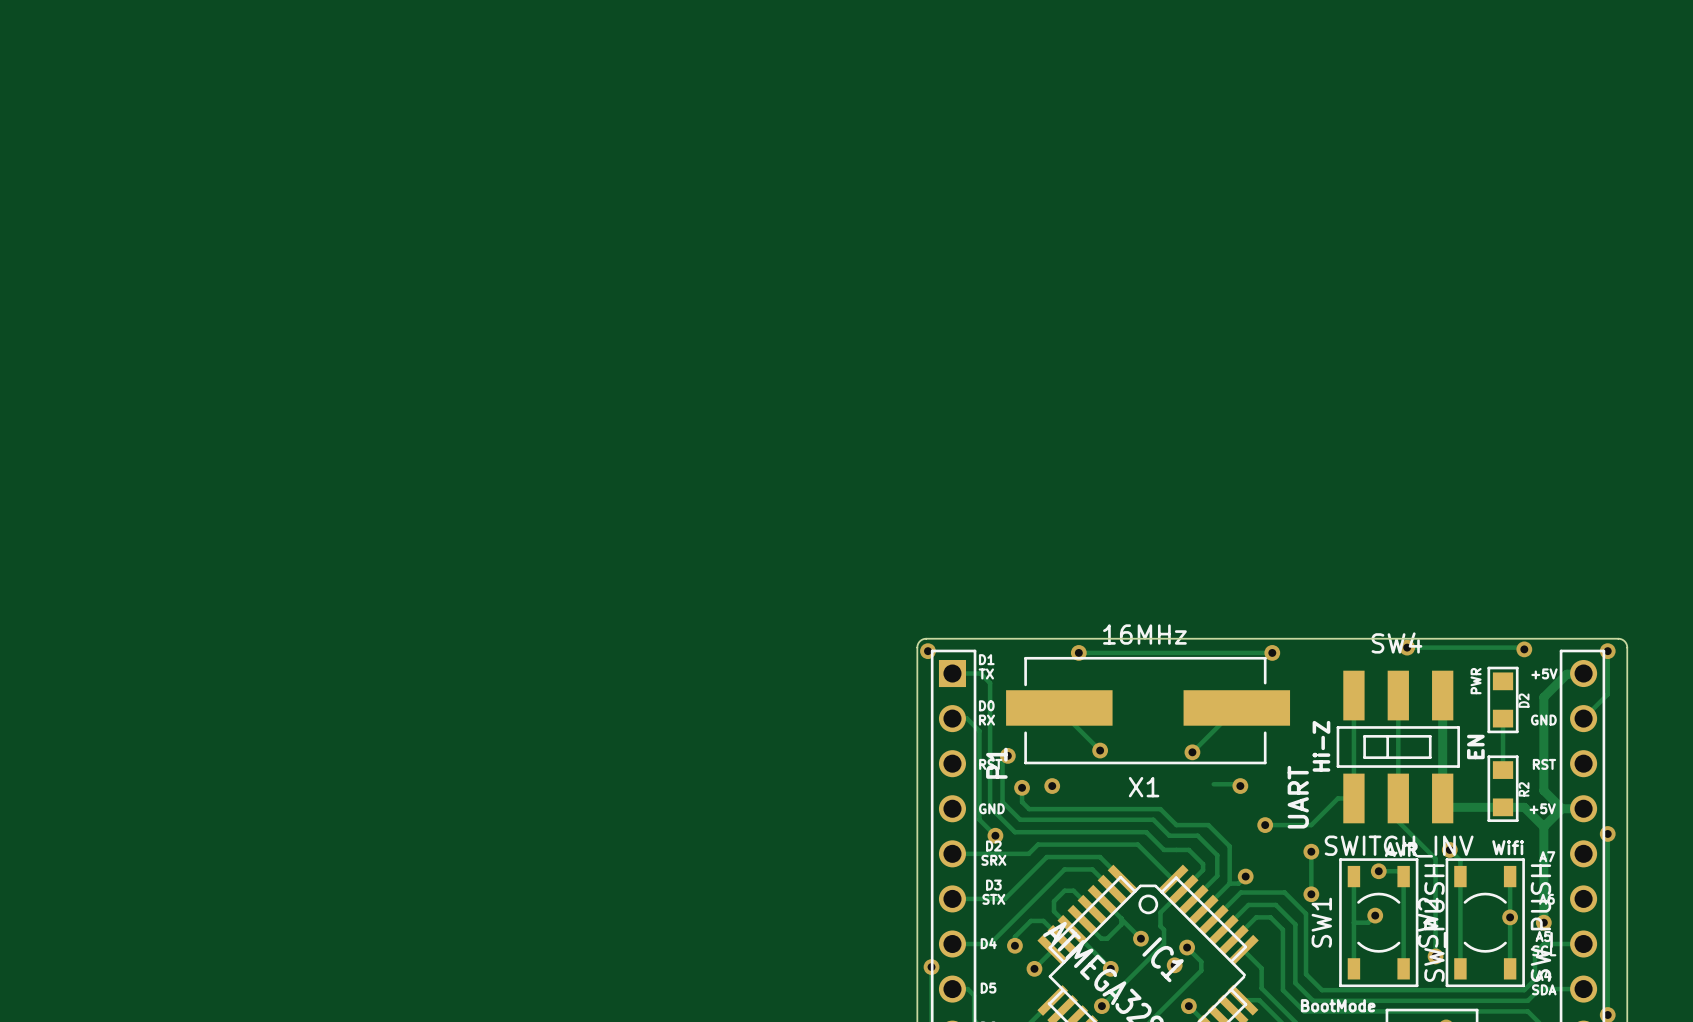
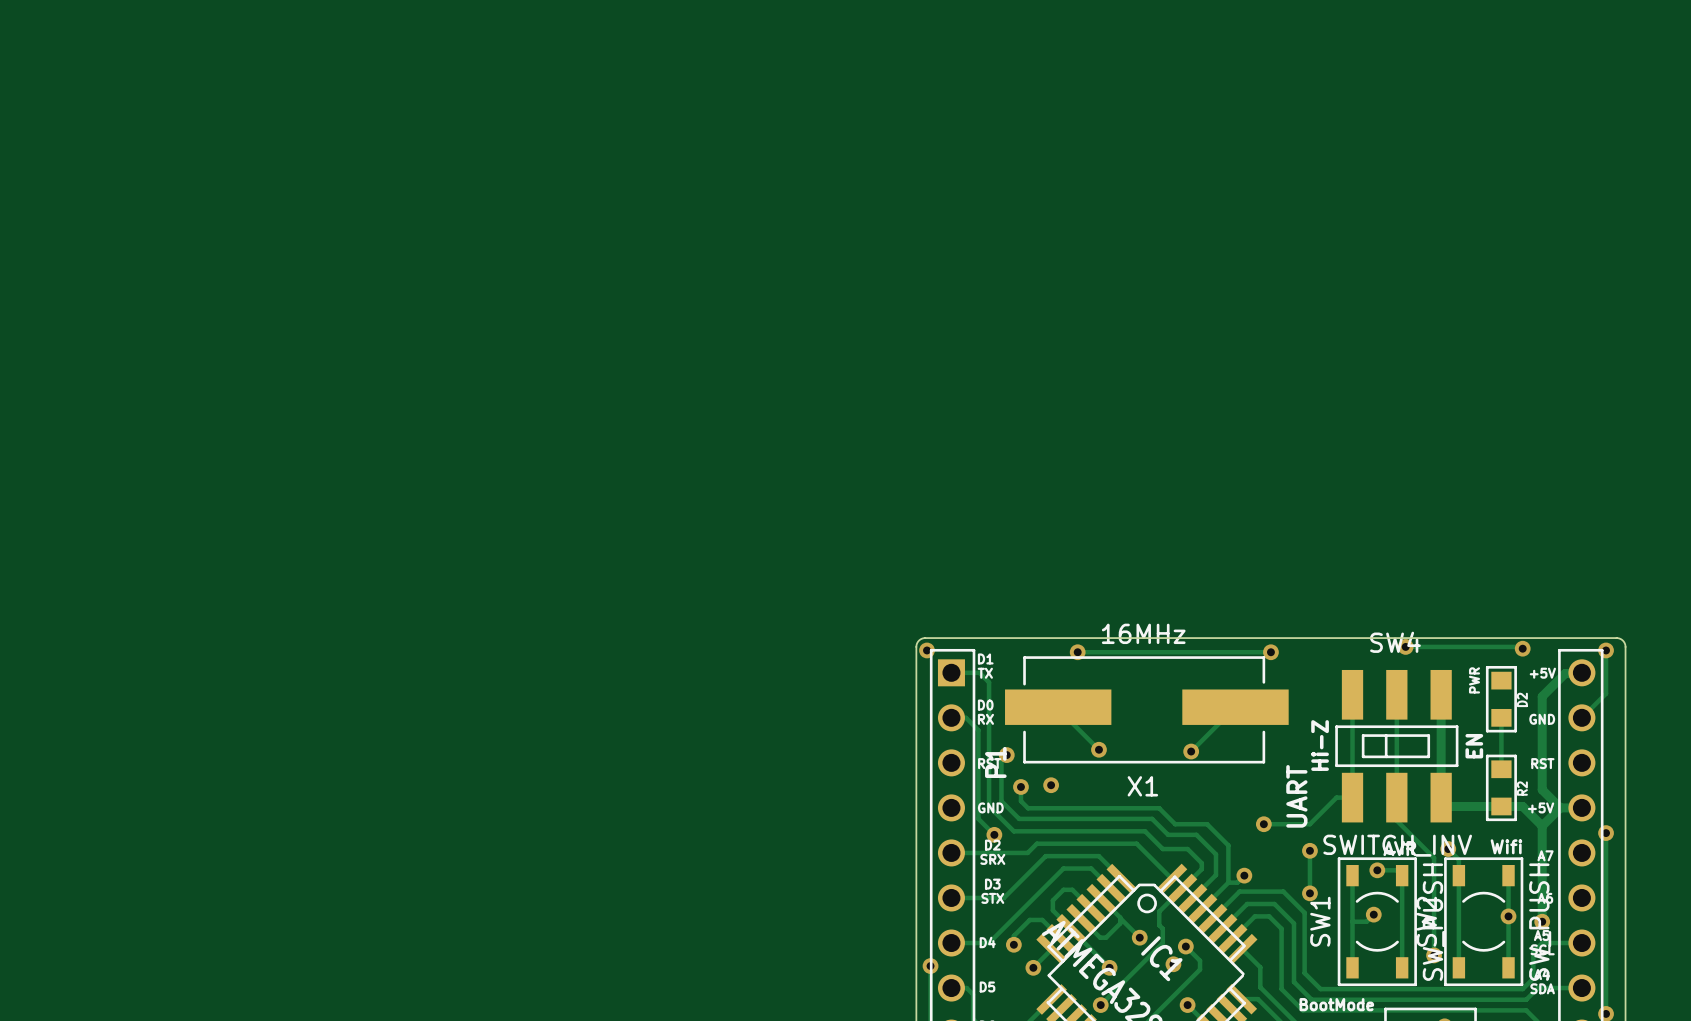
track: (1213, 784) (1238, 784) (1240, 786) -> none
via: (1240, 786) -> none

